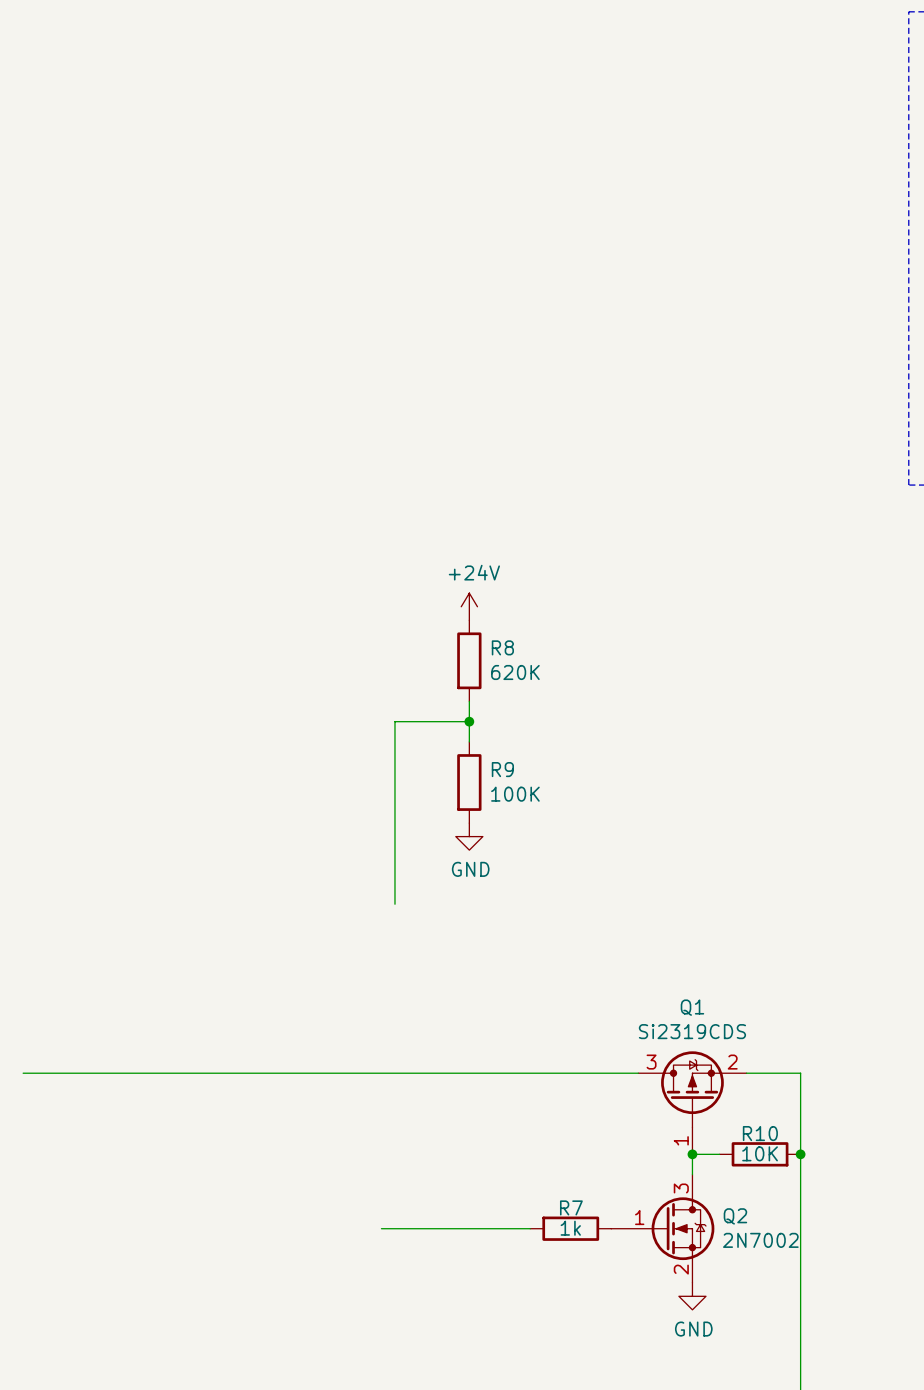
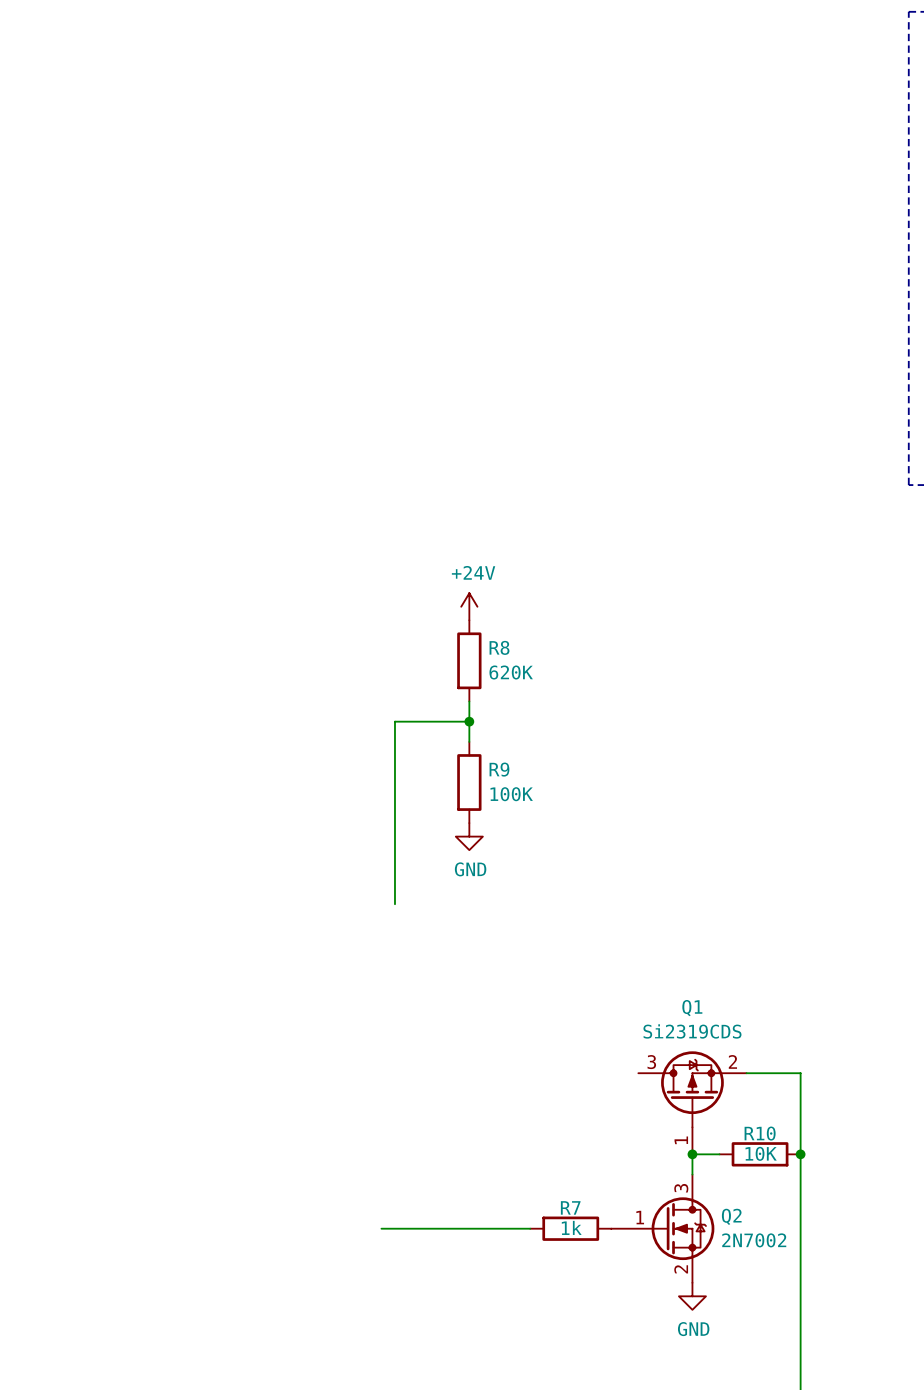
wire: (23, 1073) (638, 1073) -> none

